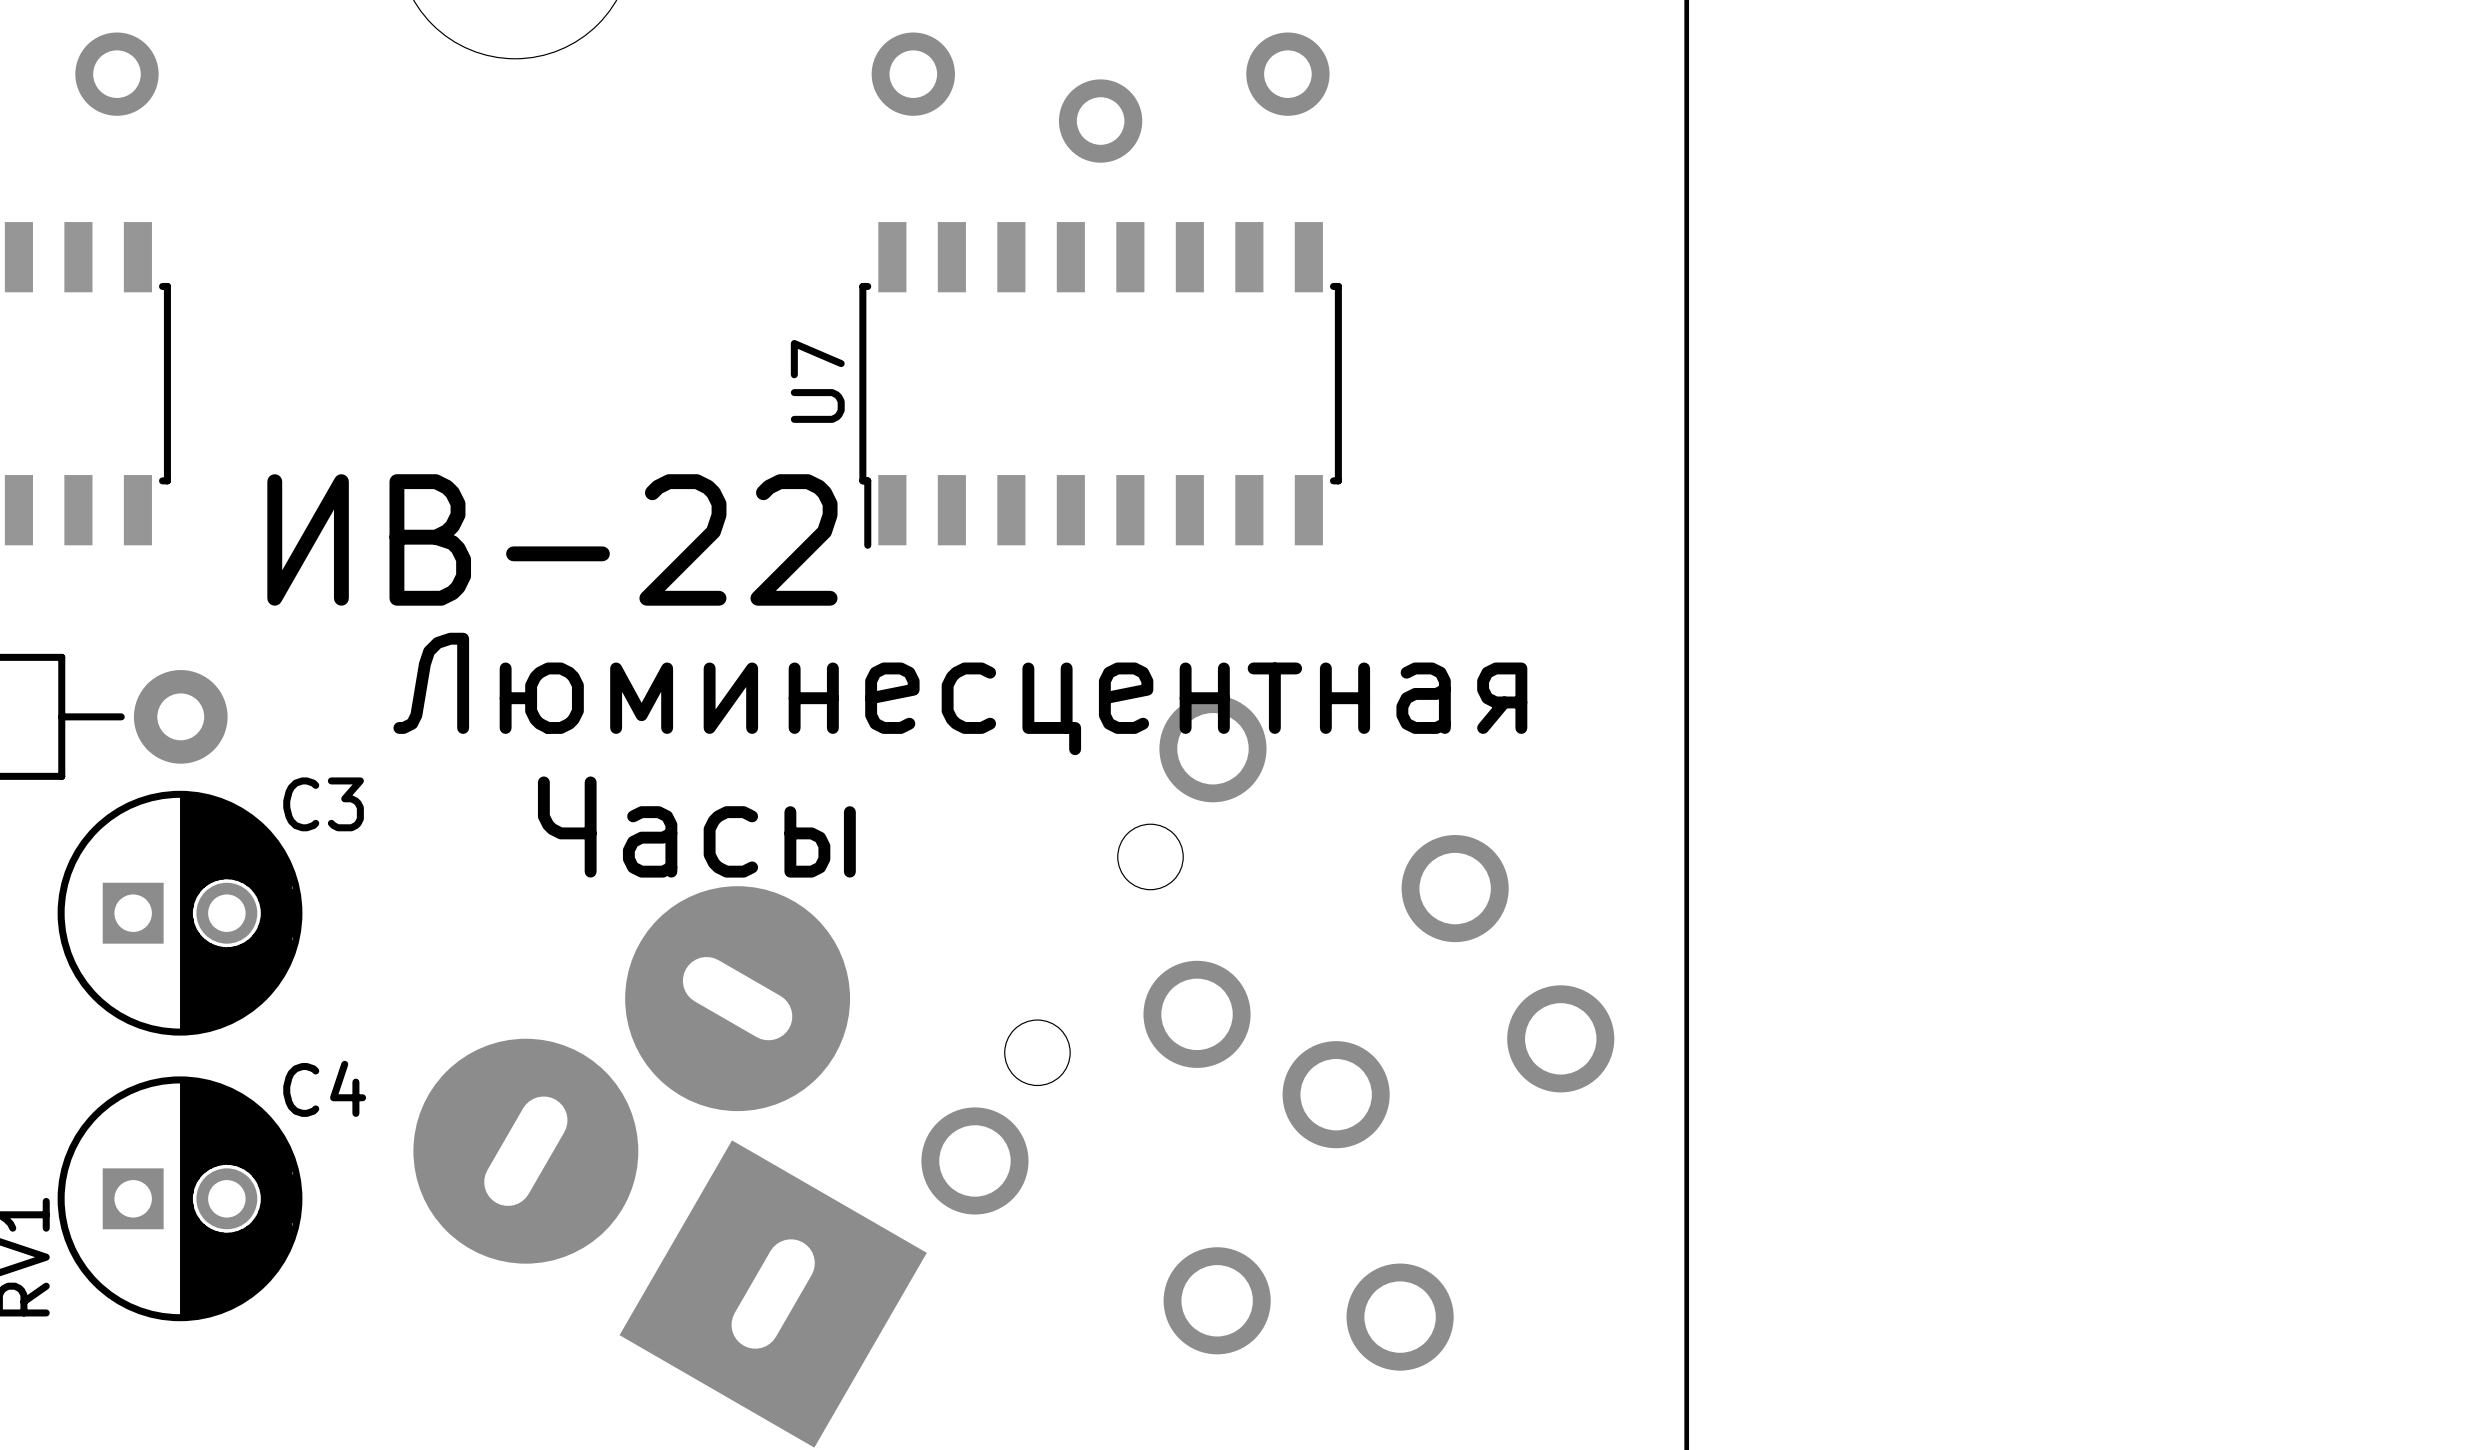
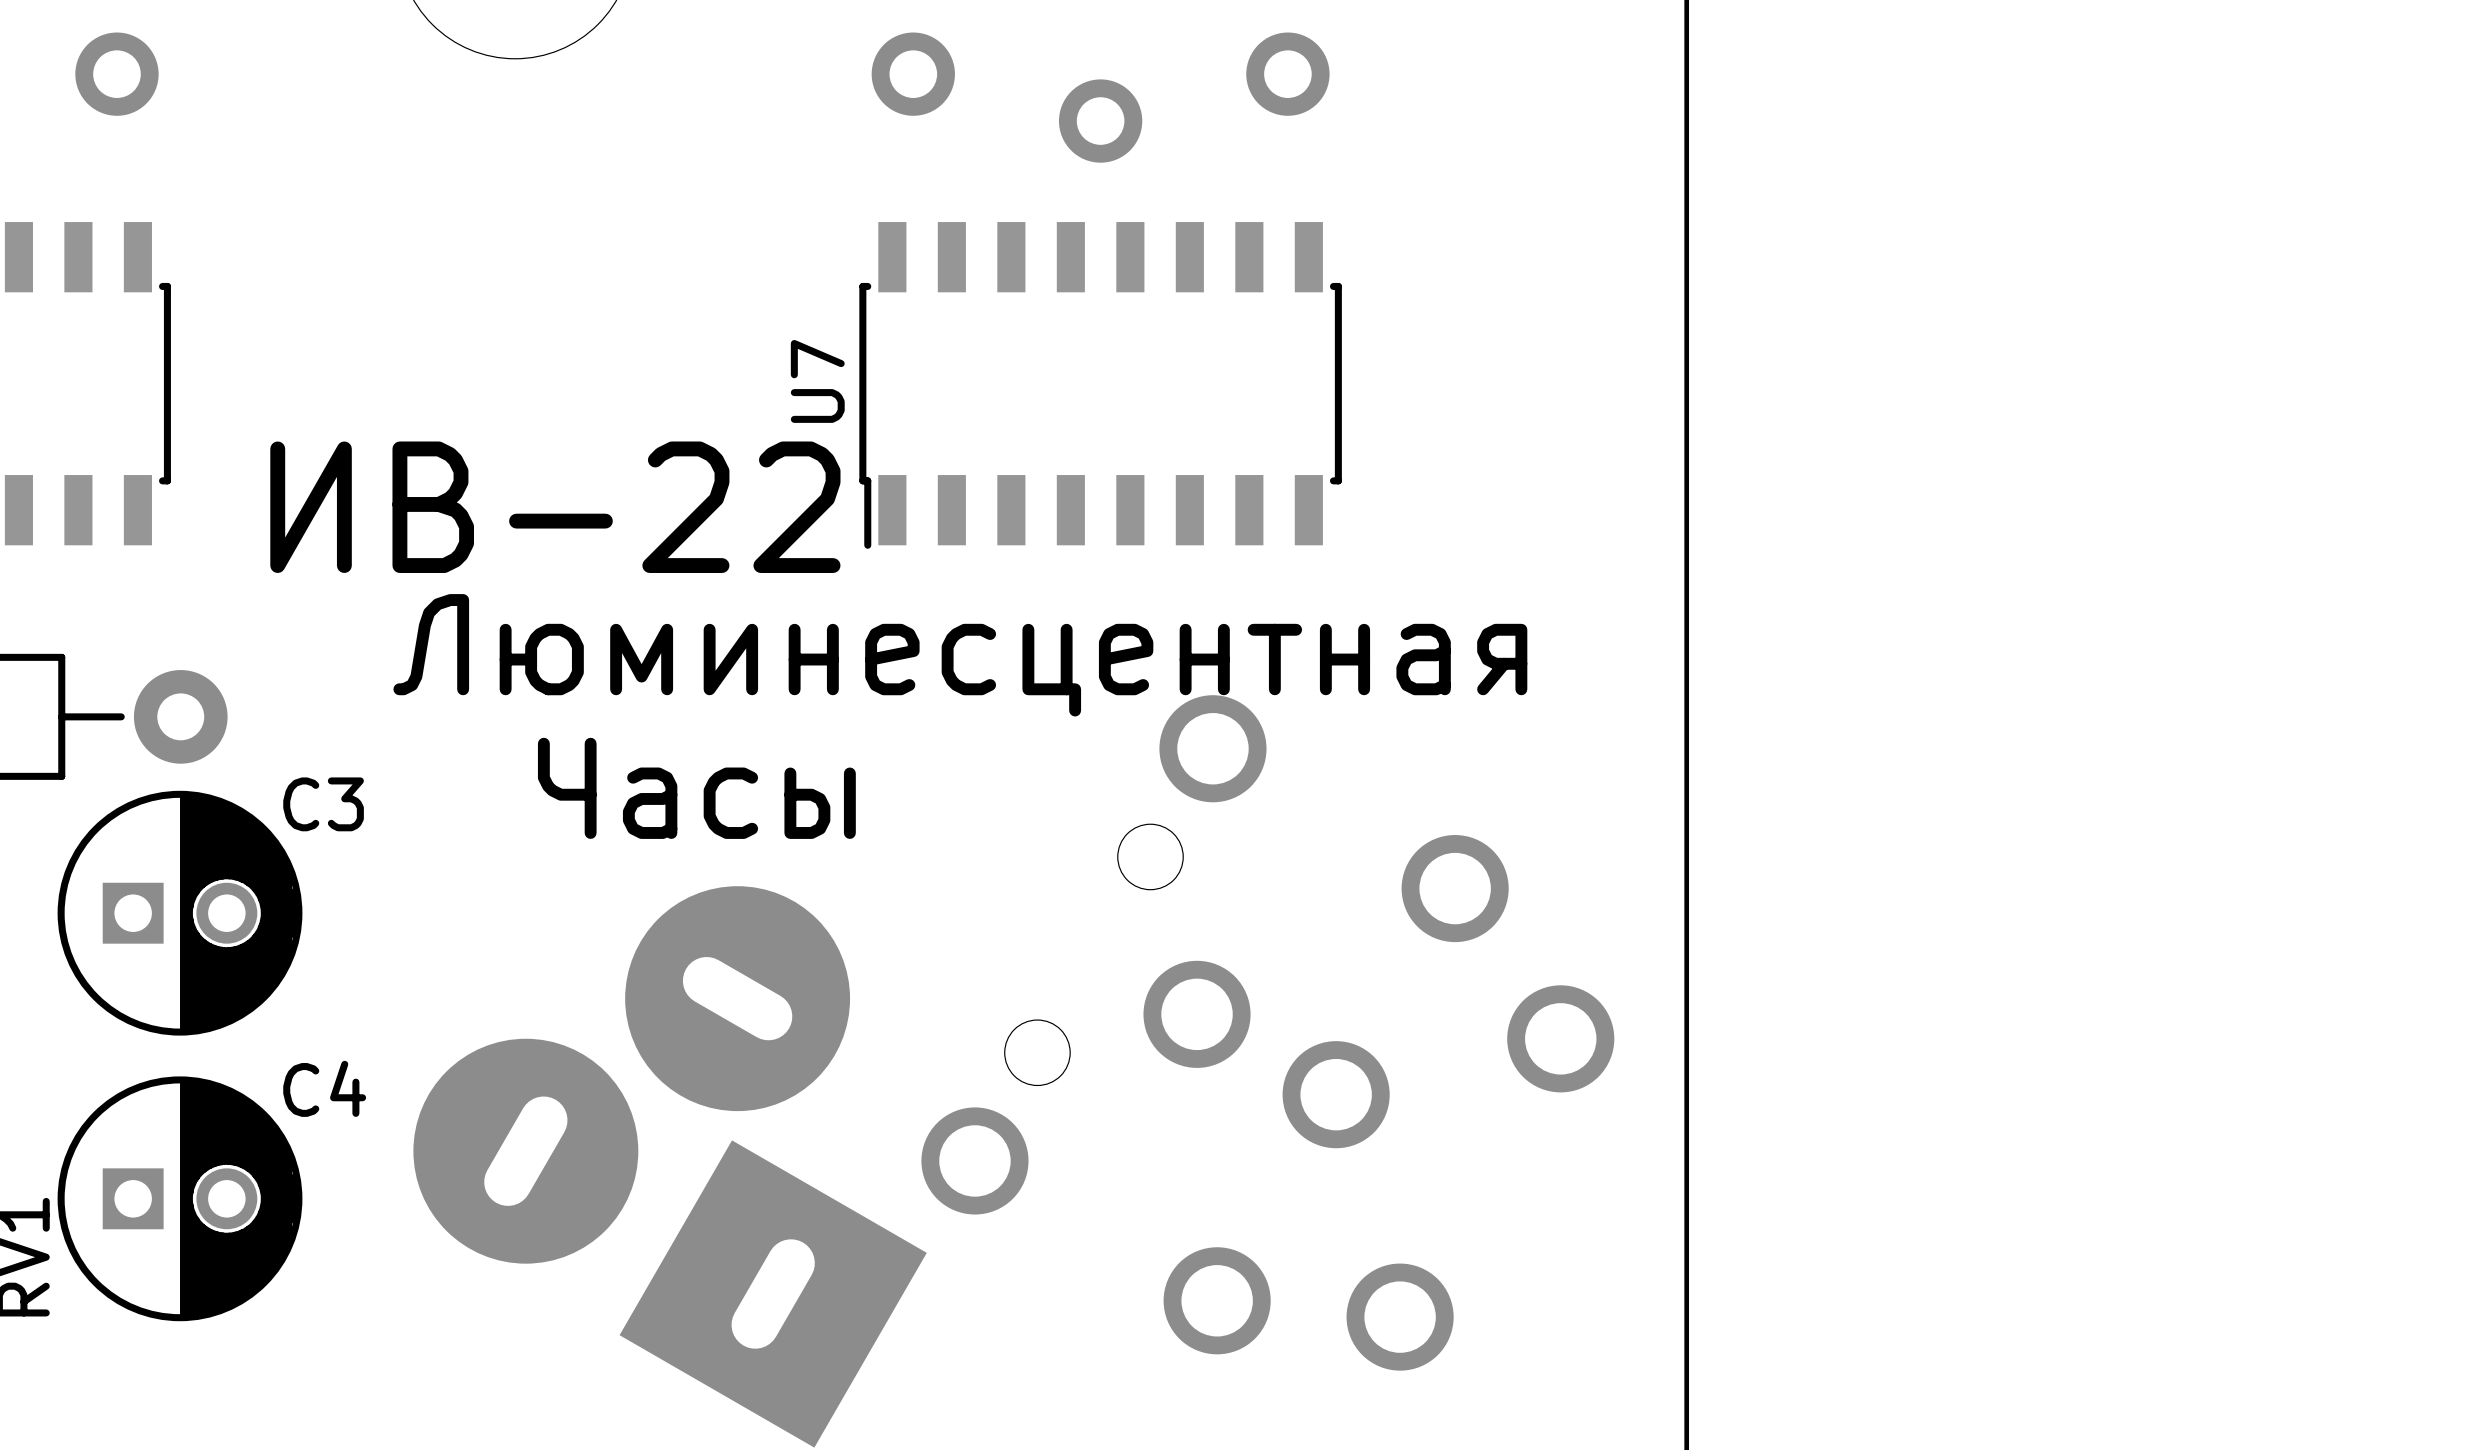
text position: ИB-22 (552, 539) -> ИB-22 (555, 507)
text position: Люминесцентная (960, 693) -> Люминесцентная (960, 655)
text position: Часы (696, 827) -> Часы (696, 788)

